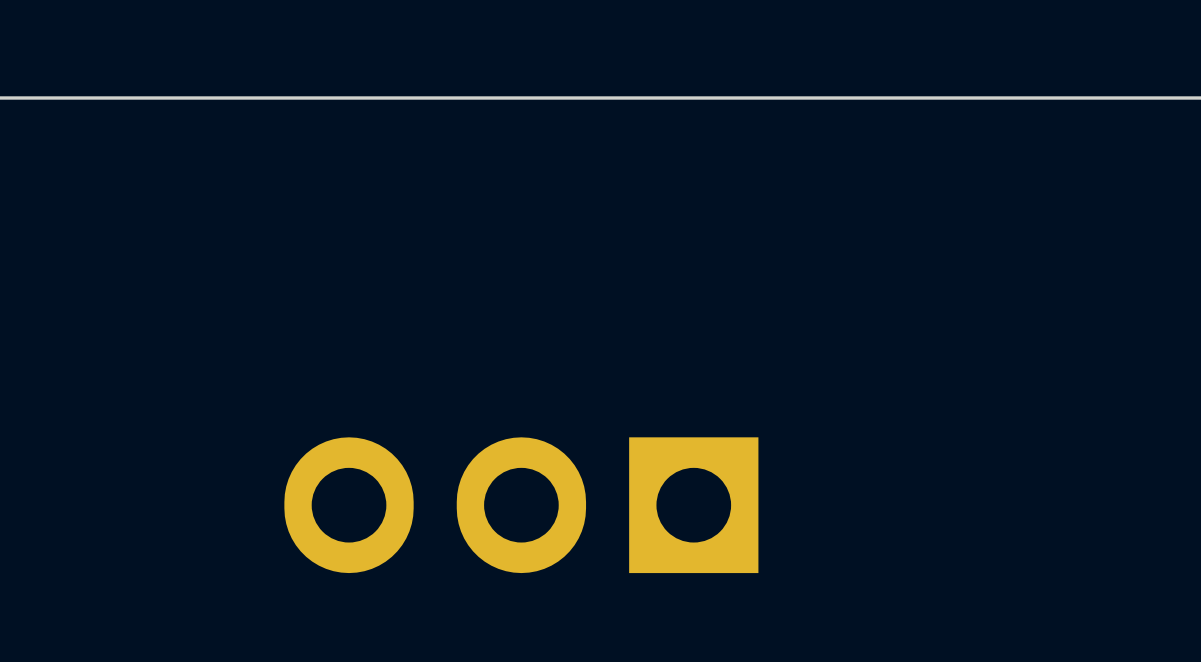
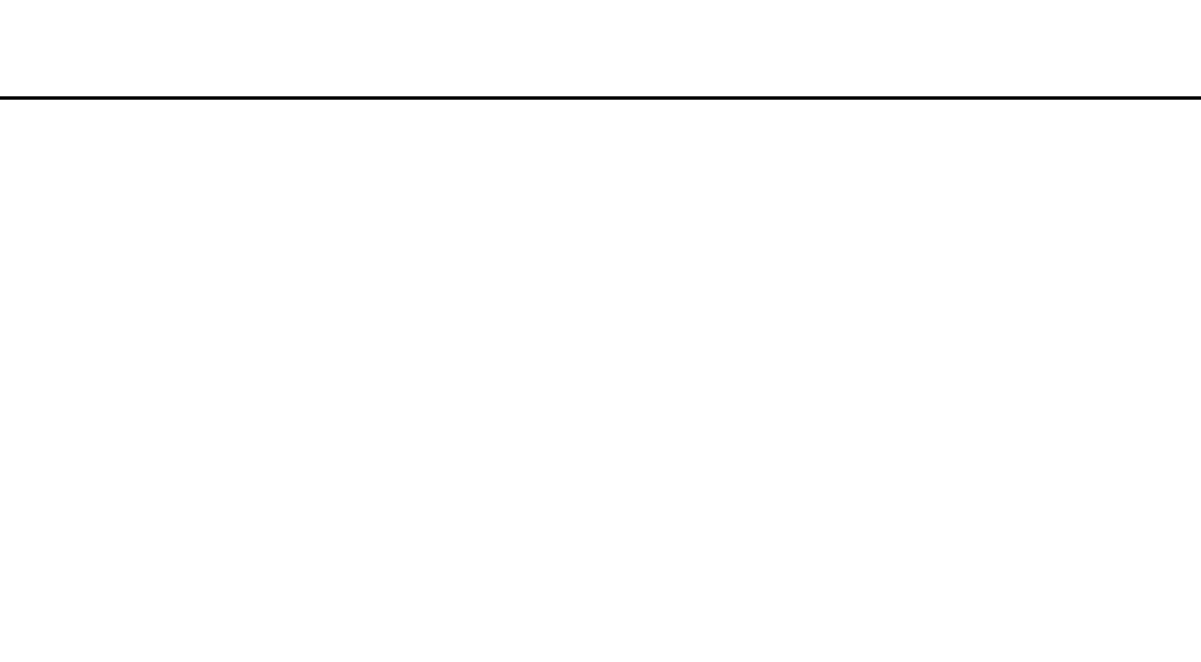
part: (521, 505) -> none

